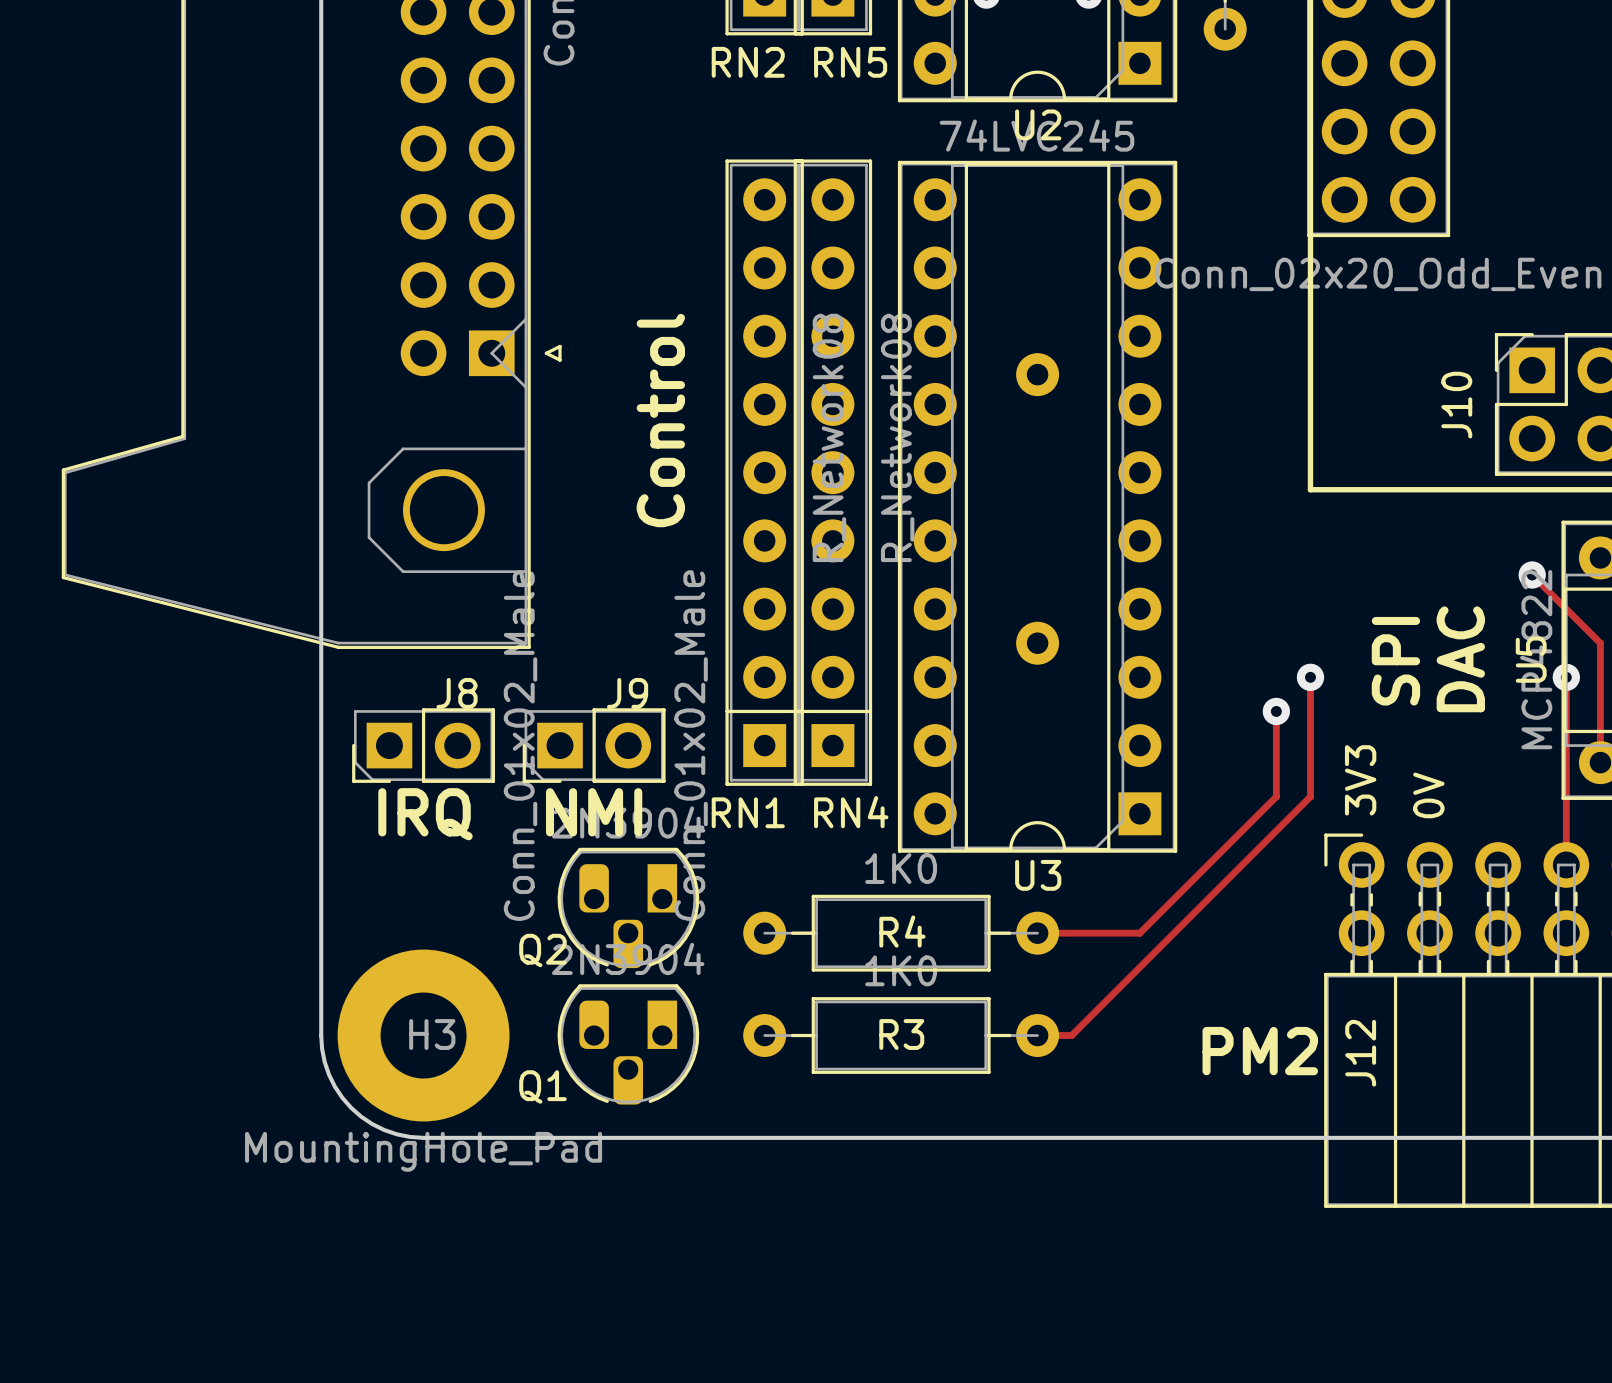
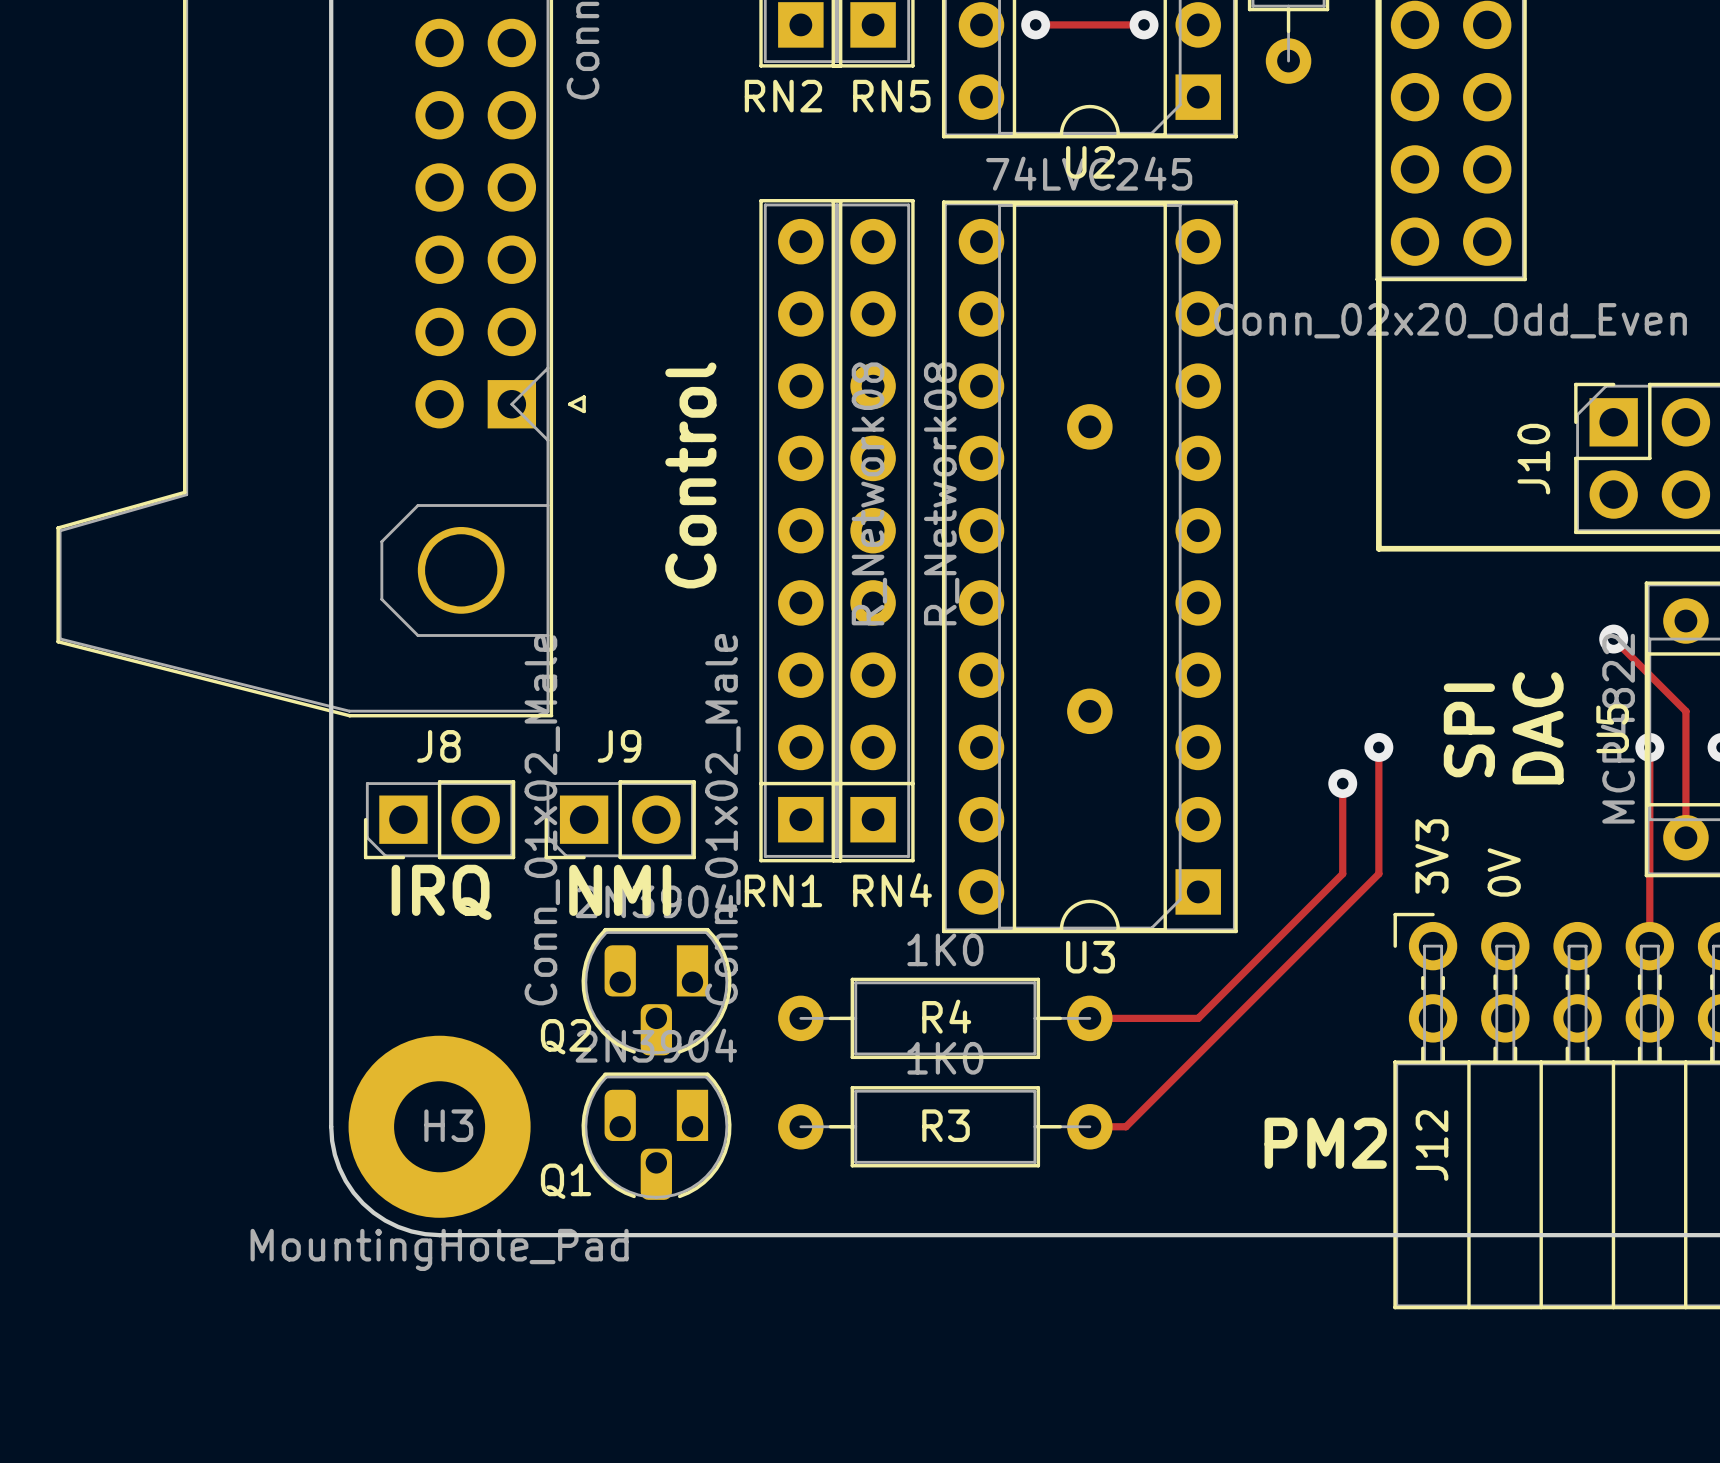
J8 name position: J8 (457, 693) -> J8 (438, 746)
J9 name position: J9 (627, 693) -> J9 (619, 746)

